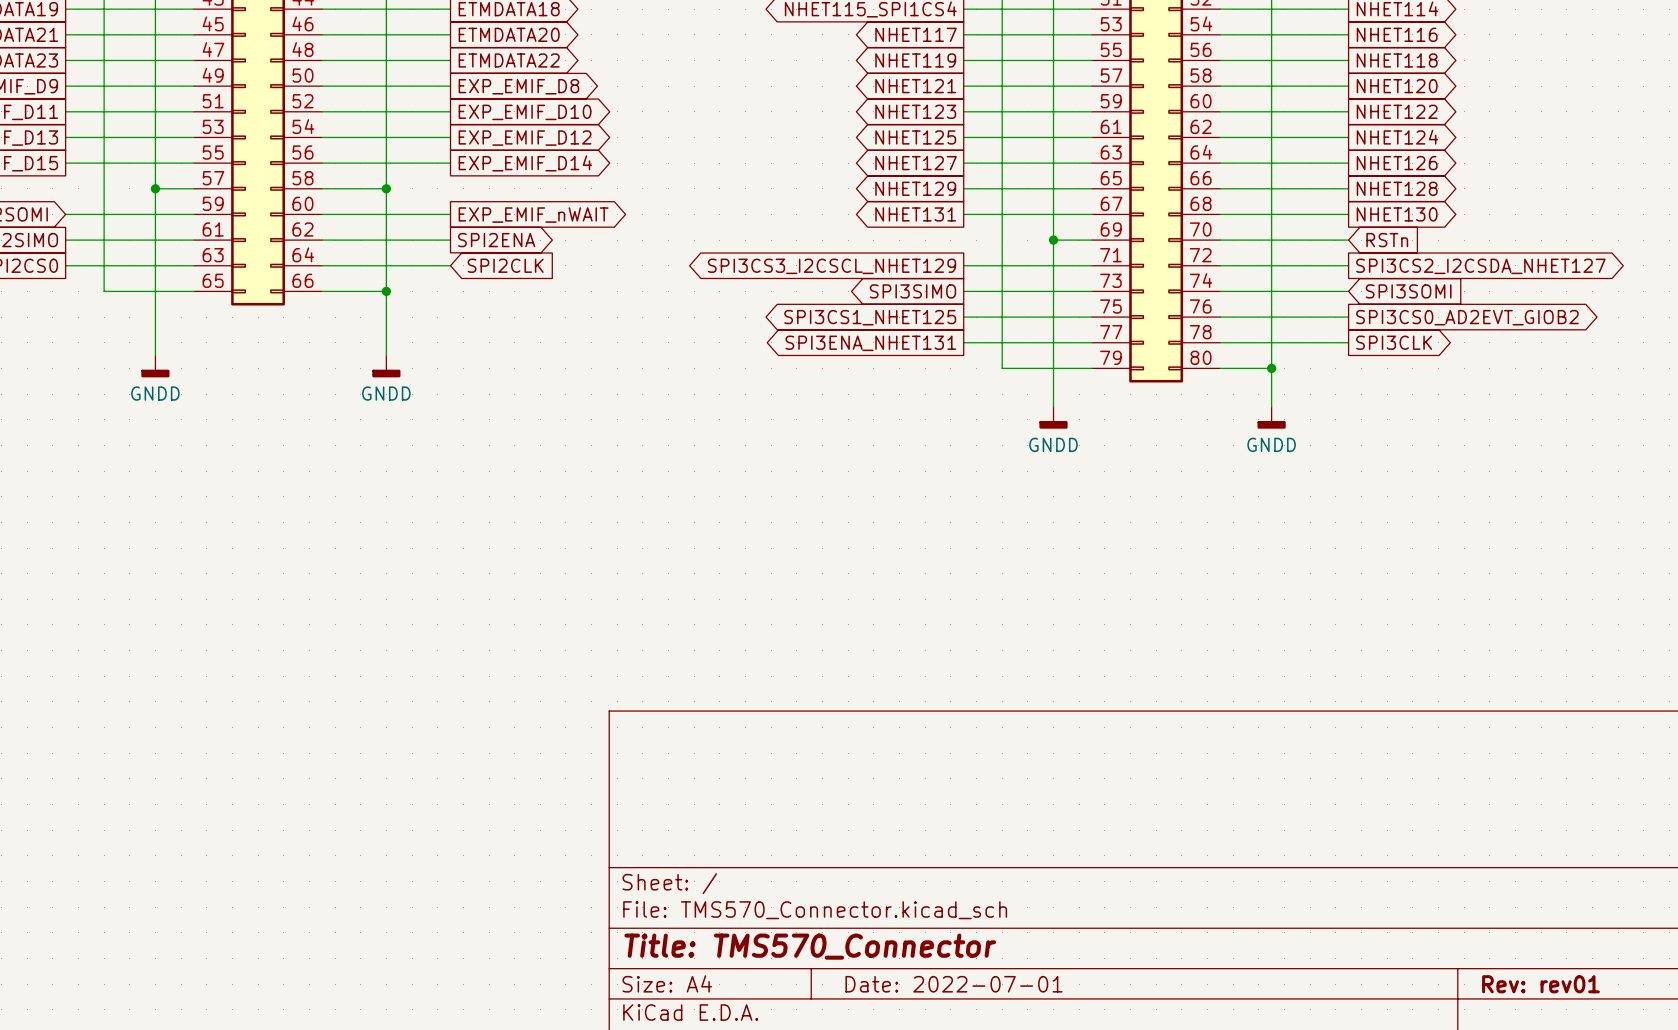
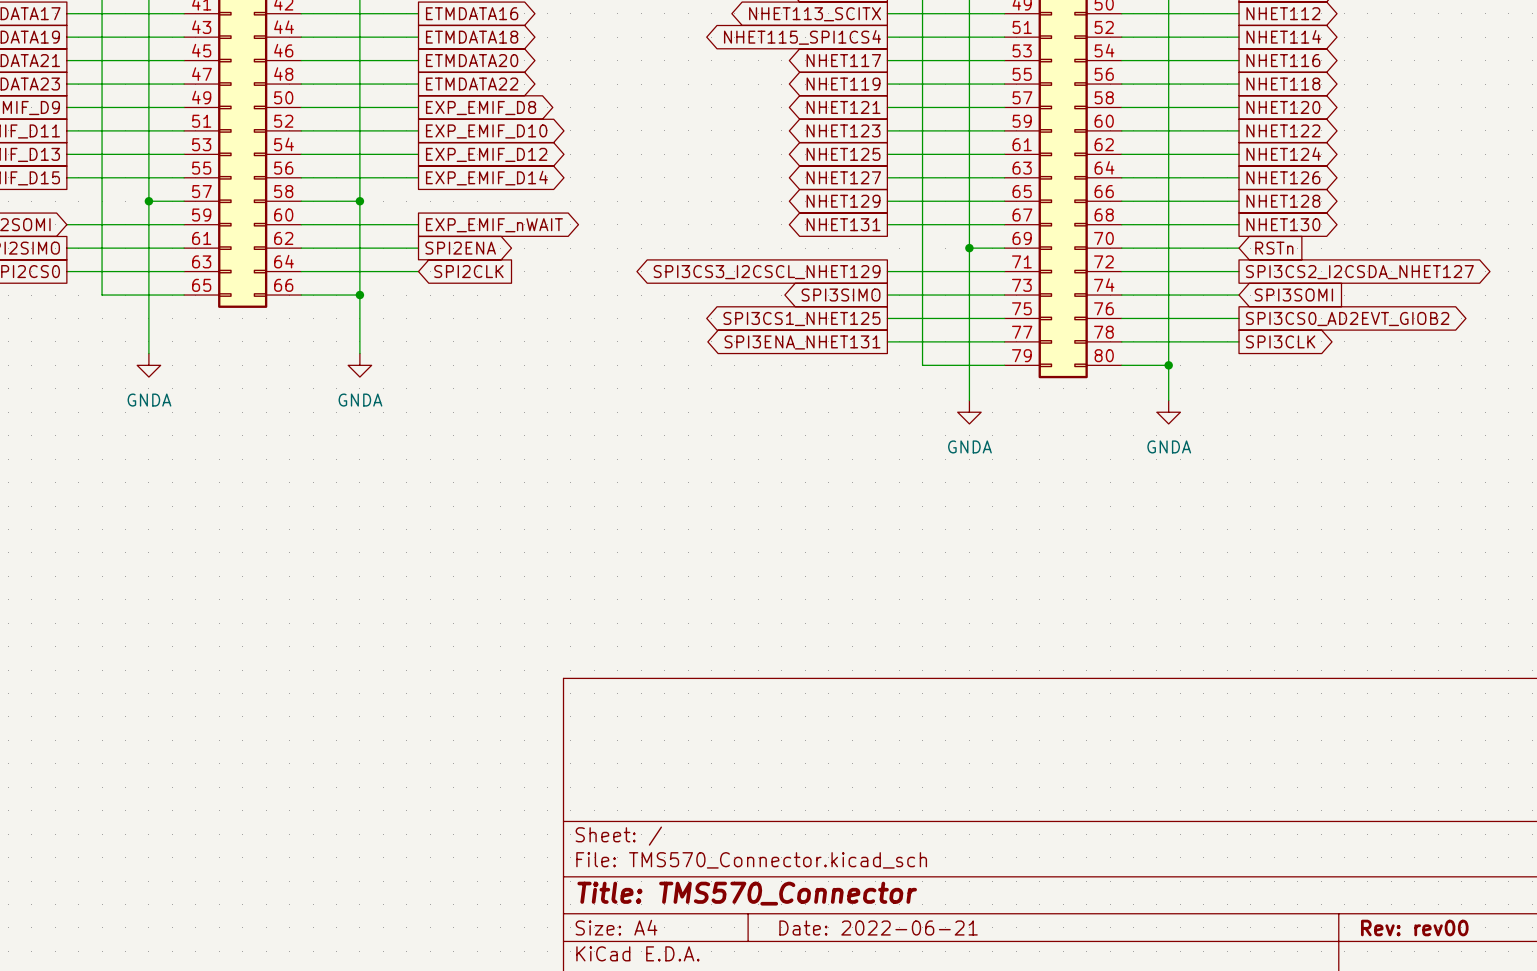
power symbol: GNDD (155, 366) -> GNDA (148, 365)
power symbol: GNDD (386, 366) -> GNDA (359, 365)
power symbol: GNDD (1053, 417) -> GNDA (969, 412)
power symbol: GNDD (1271, 417) -> GNDA (1168, 412)
title block: Date: 2022-07-01 (954, 984) -> Date: 2022-06-21 (878, 928)
title block: Rev: rev01 (1540, 984) -> Rev: rev00 (1414, 928)

